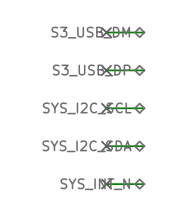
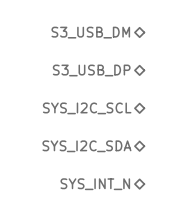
wire: (106, 32) (144, 32) -> none
no-connect mark: (106, 32) -> none
wire: (106, 70) (144, 70) -> none
no-connect mark: (106, 70) -> none
wire: (106, 108) (144, 108) -> none
no-connect mark: (106, 108) -> none
wire: (106, 146) (144, 146) -> none
no-connect mark: (106, 146) -> none
wire: (106, 184) (144, 184) -> none
no-connect mark: (106, 184) -> none

